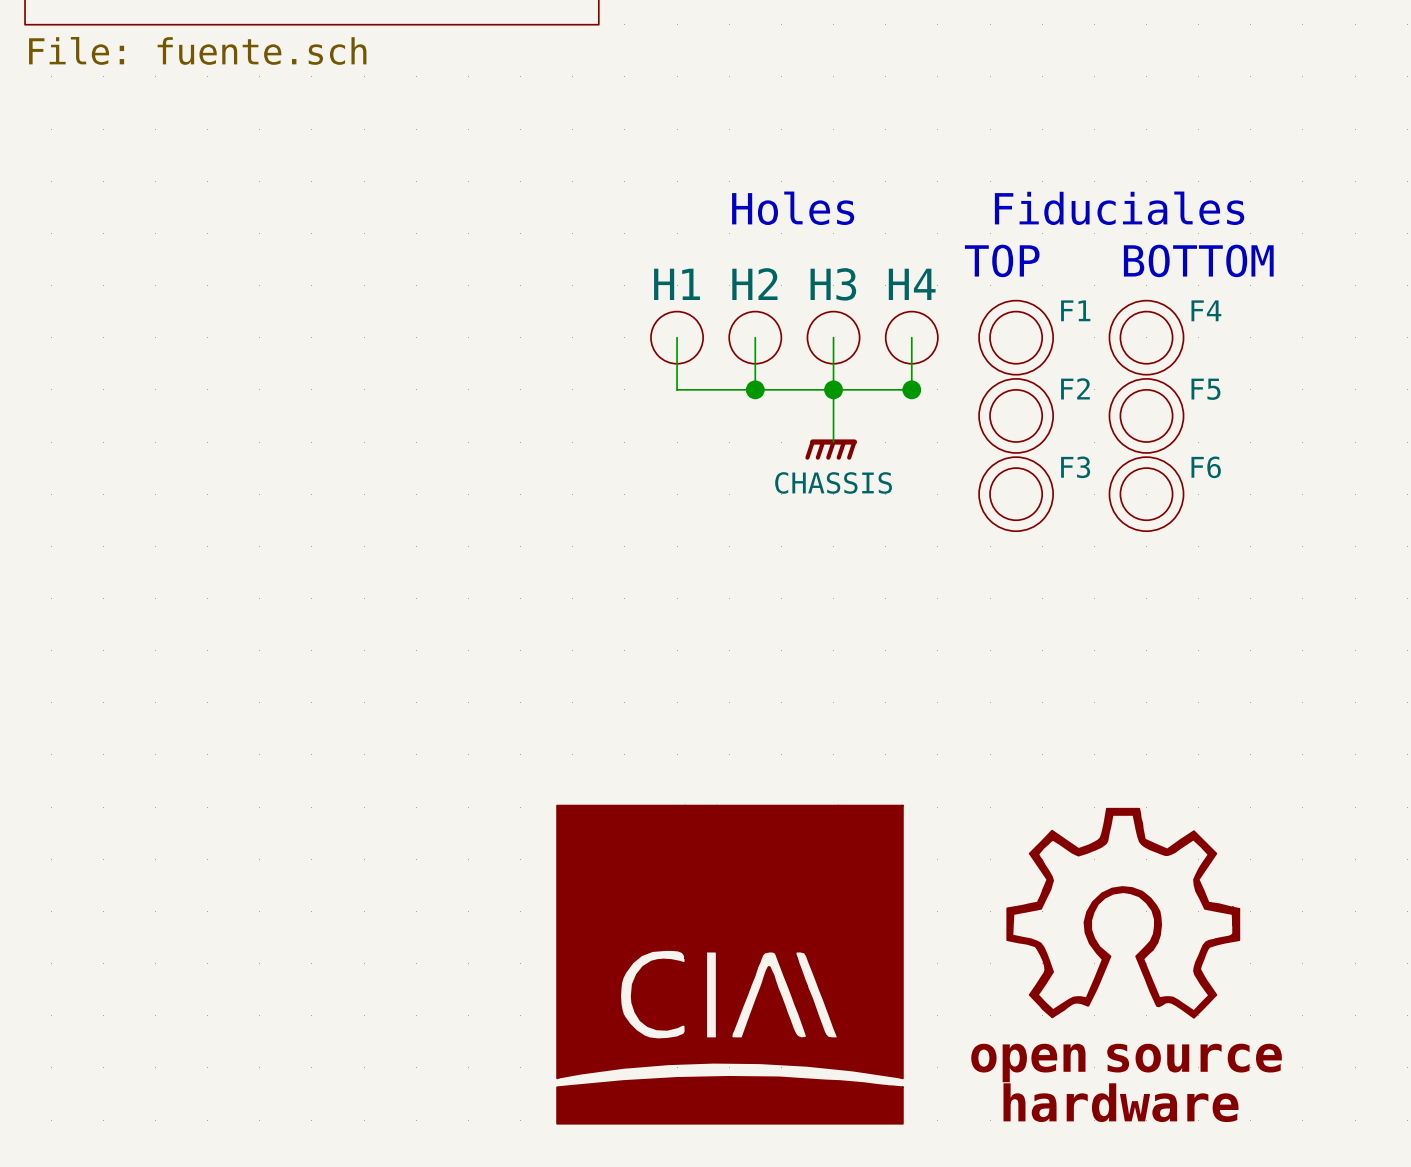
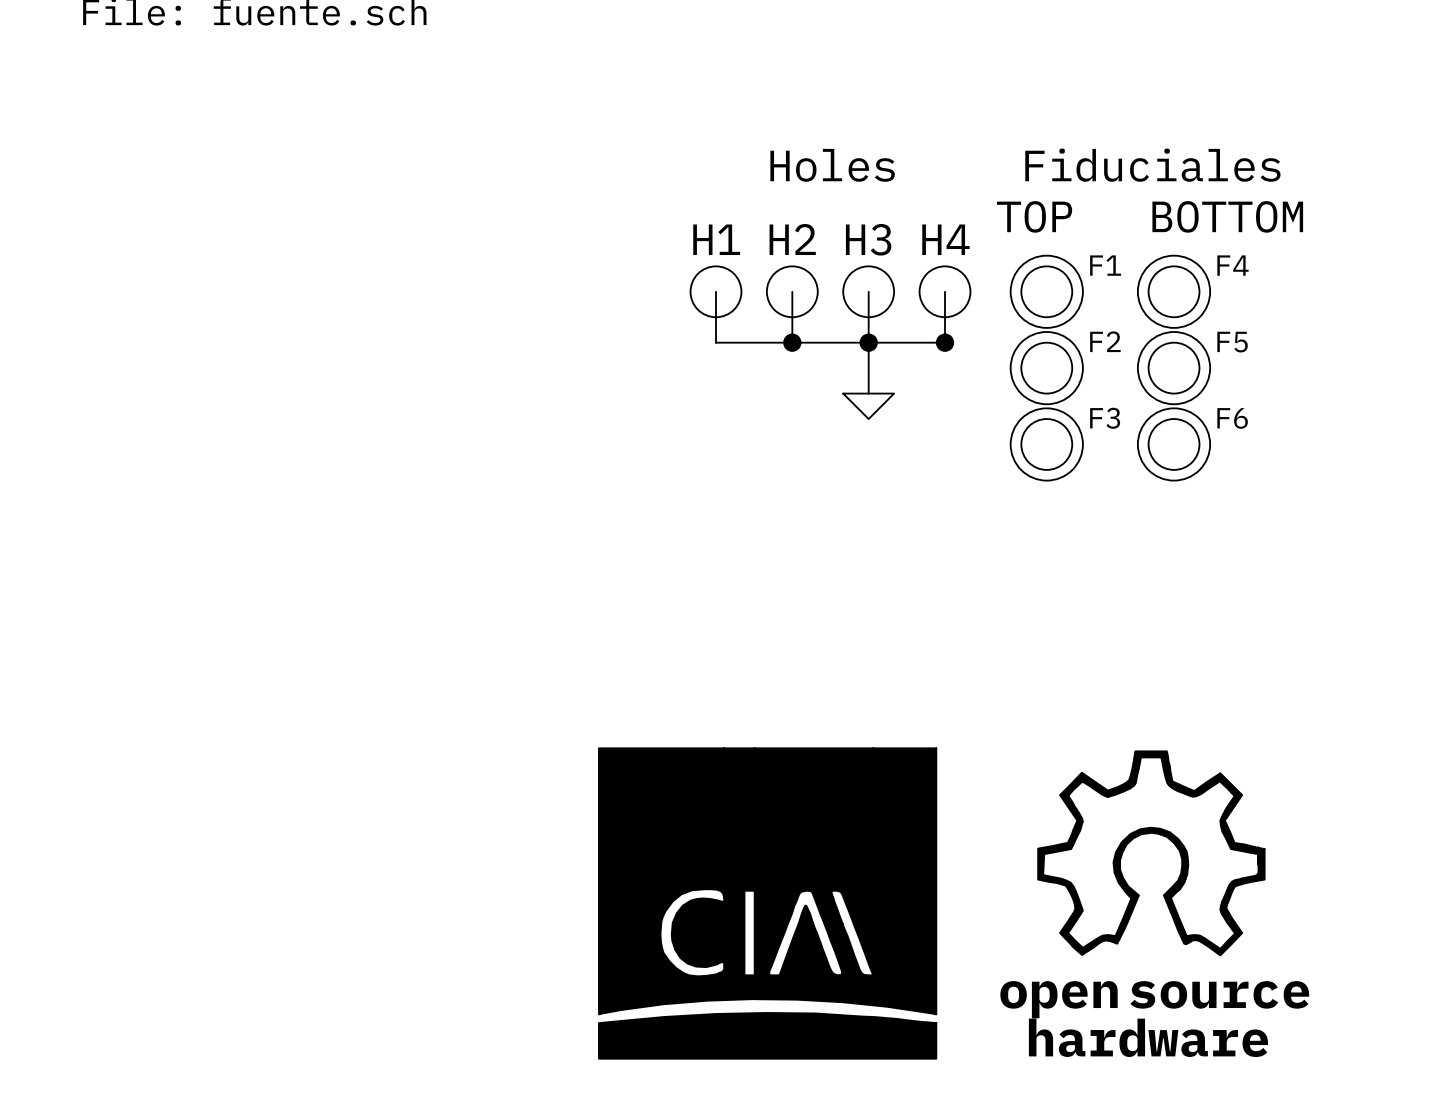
power symbol shape: [805, 439, 858, 460] -> [843, 393, 895, 420]
power symbol text: CHASSIS (833, 482) -> none

